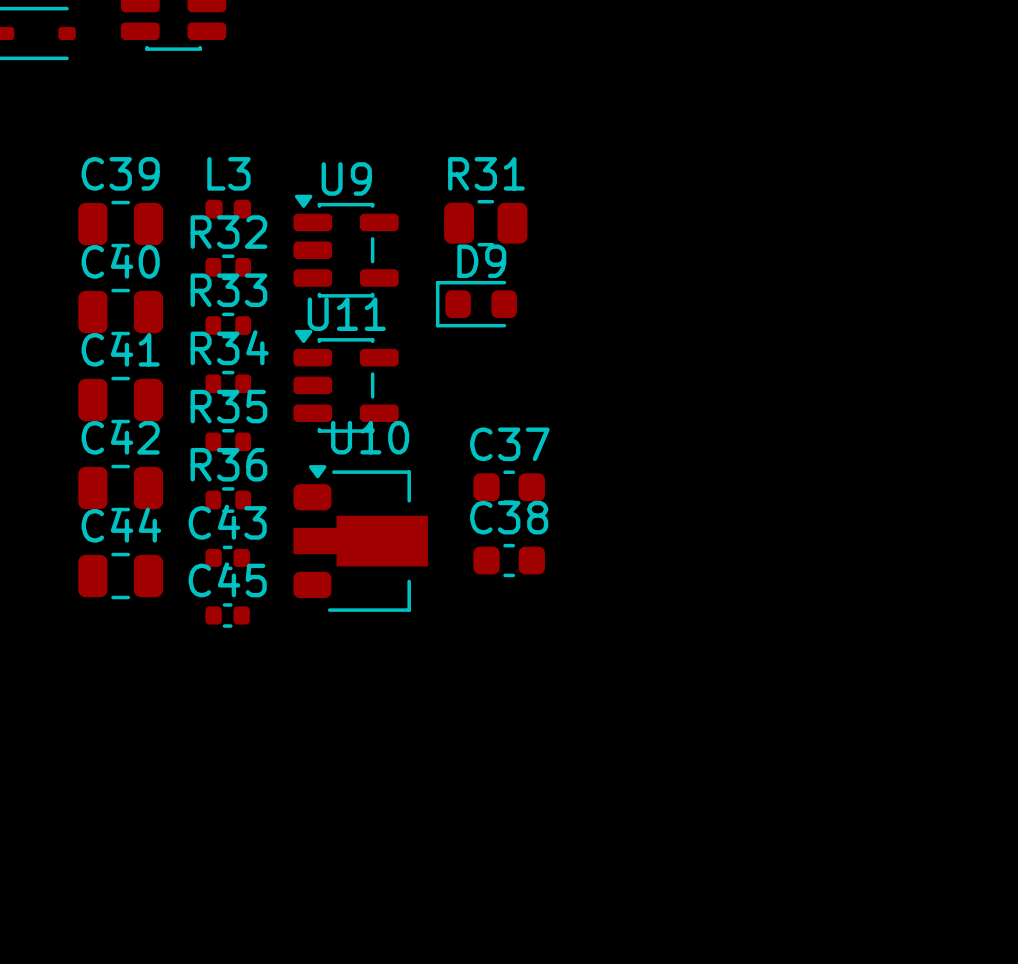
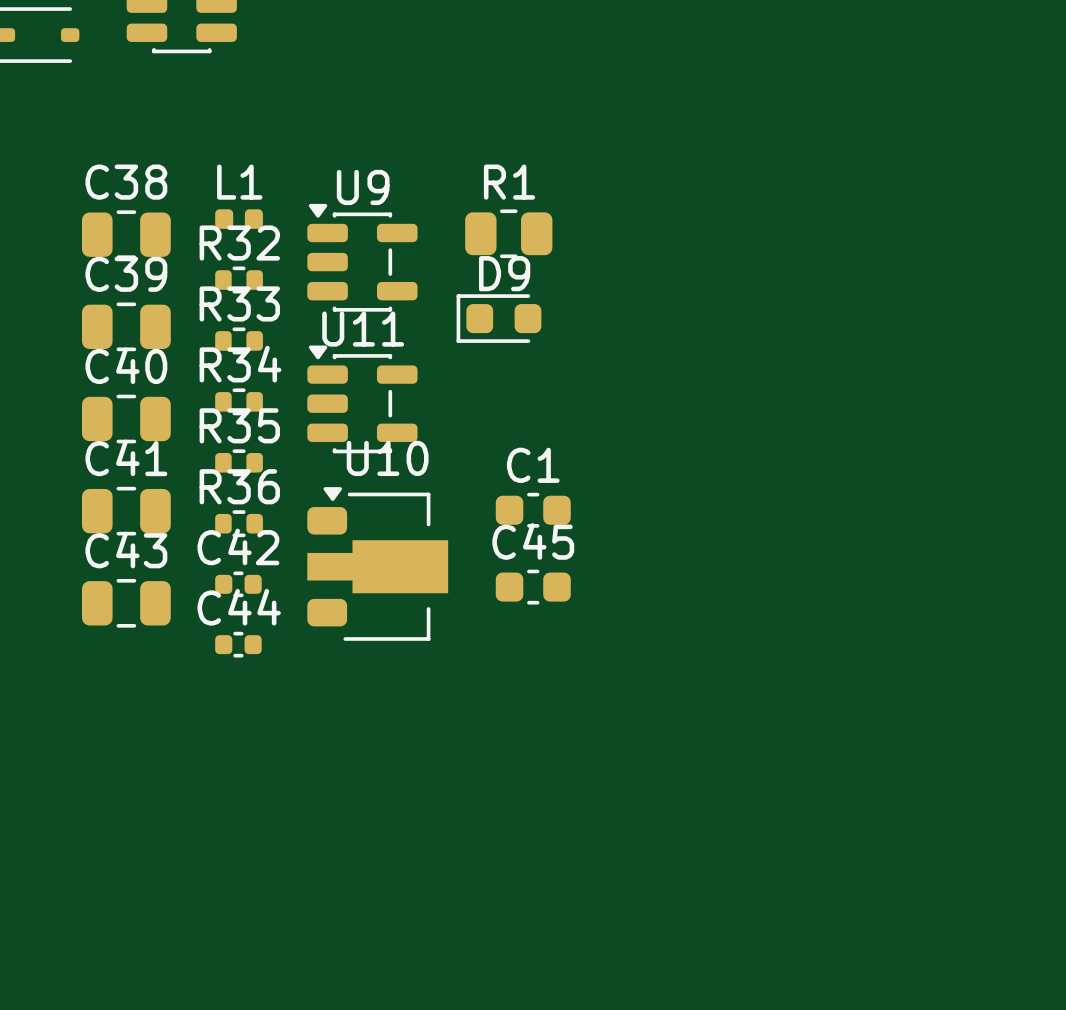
C39 name: C39 (120, 173) -> C38 (126, 182)
L3 name: L3 (228, 173) -> L1 (239, 182)
R31 name: R31 (486, 173) -> R1 (509, 182)
C40 name: C40 (120, 261) -> C39 (126, 274)
C41 name: C41 (120, 349) -> C40 (126, 365)
C42 name: C42 (120, 437) -> C41 (126, 457)
C37 name: C37 (509, 444) -> C1 (533, 465)
C38 name: C38 (509, 517) -> C45 (533, 541)
C43 name: C43 (227, 522) -> C42 (238, 546)
C44 name: C44 (121, 525) -> C43 (126, 550)
C45 name: C45 (227, 579) -> C44 (239, 607)

